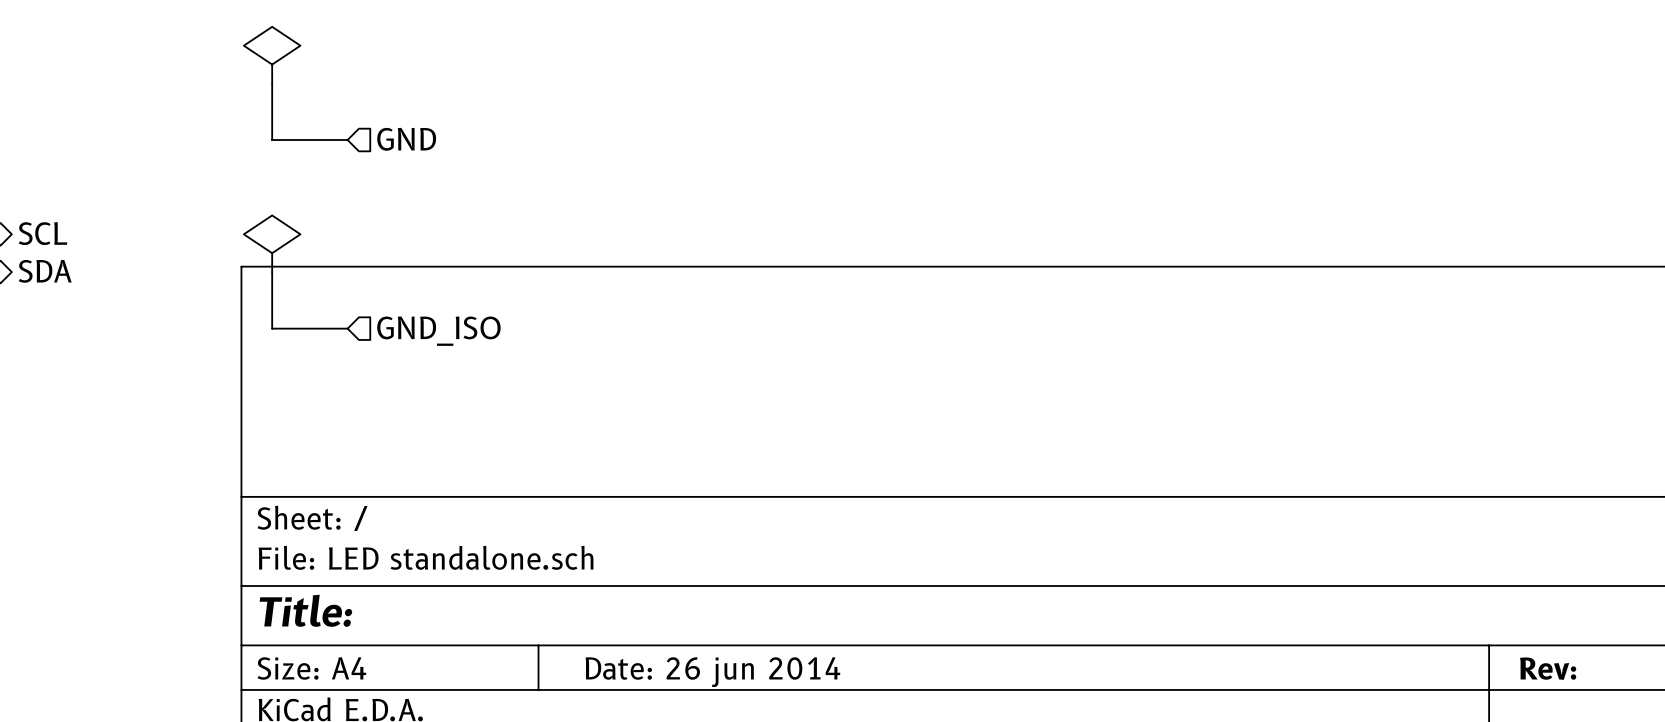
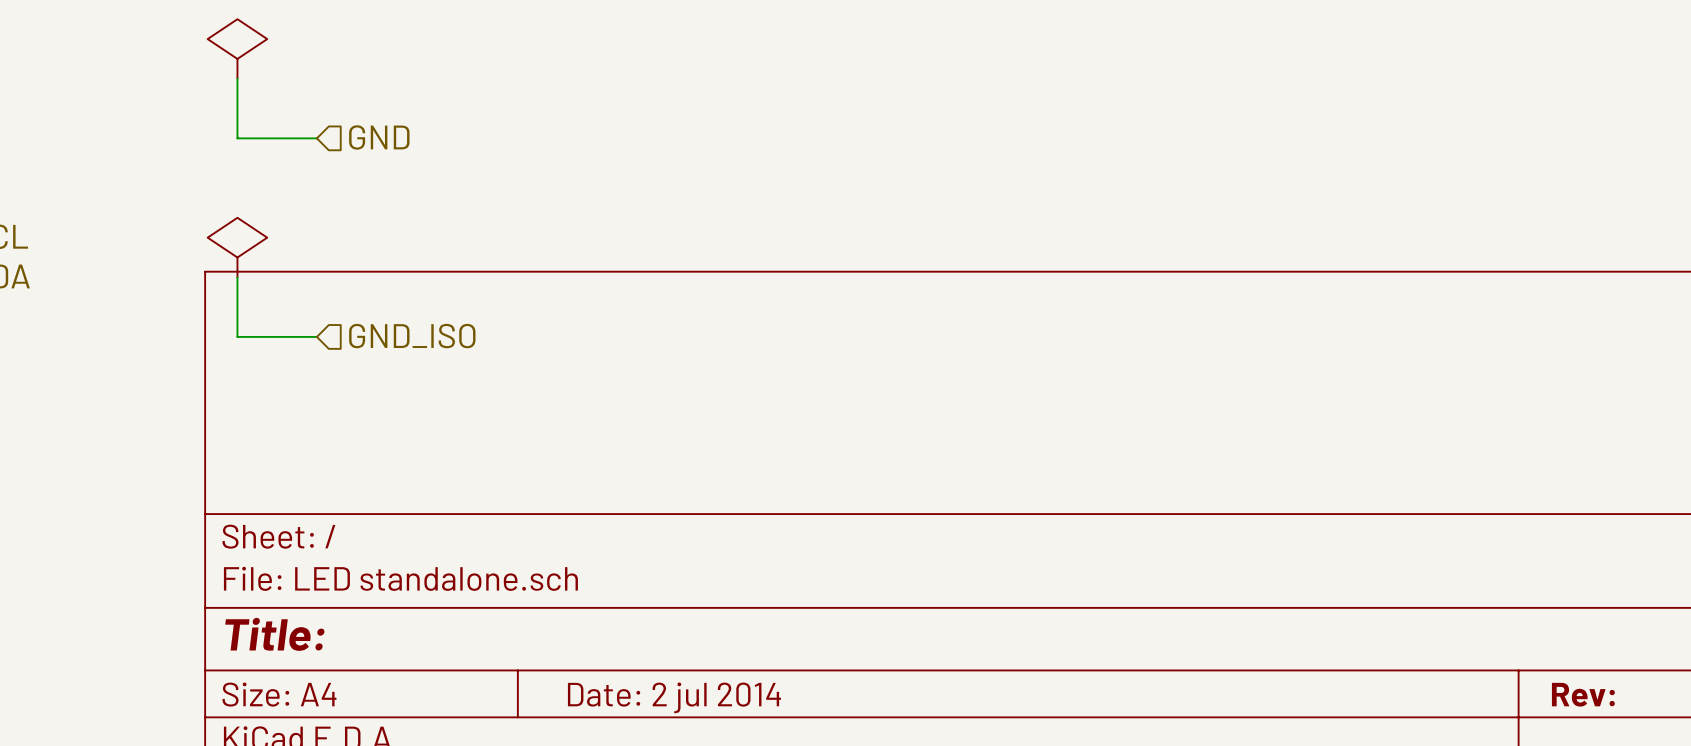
title block: Date: 26 jun 2014 (712, 672) -> Date: 2 jul 2014 (674, 697)

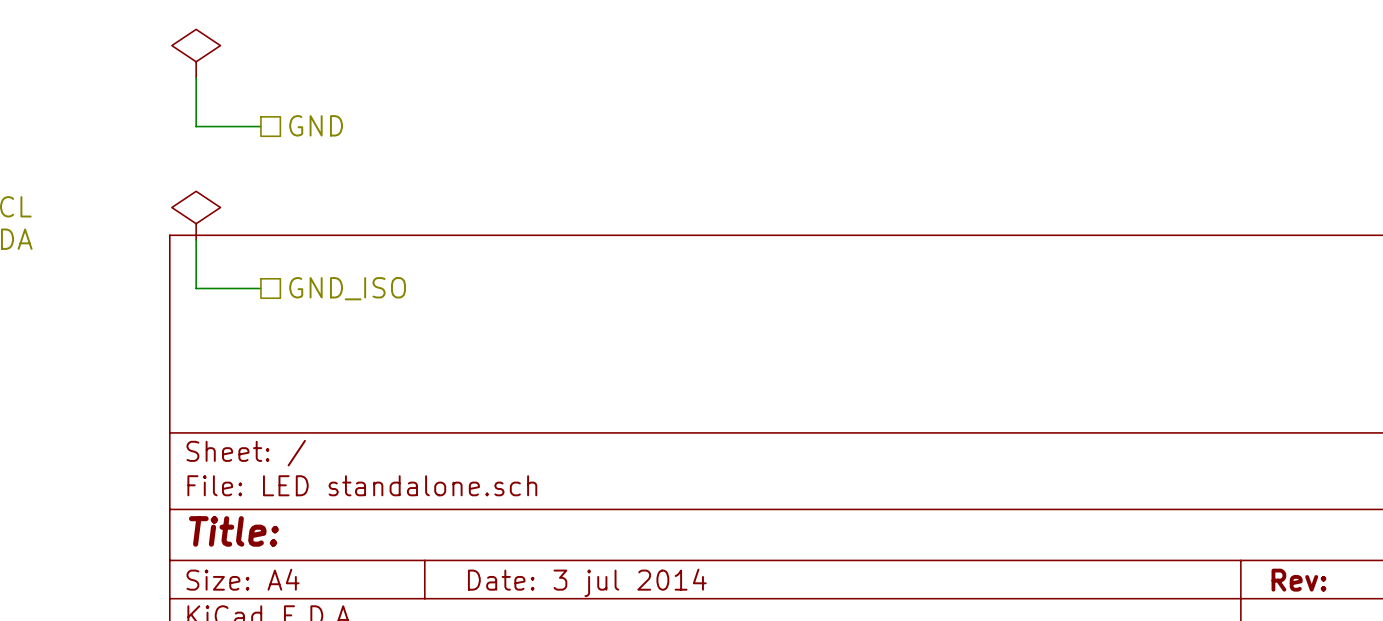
hierarchical label shape: input (379, 137) -> passive (316, 125)
hierarchical label shape: input (412, 336) -> passive (347, 288)
title block: Date: 2 jul 2014 (674, 697) -> Date: 3 jul 2014 (587, 582)

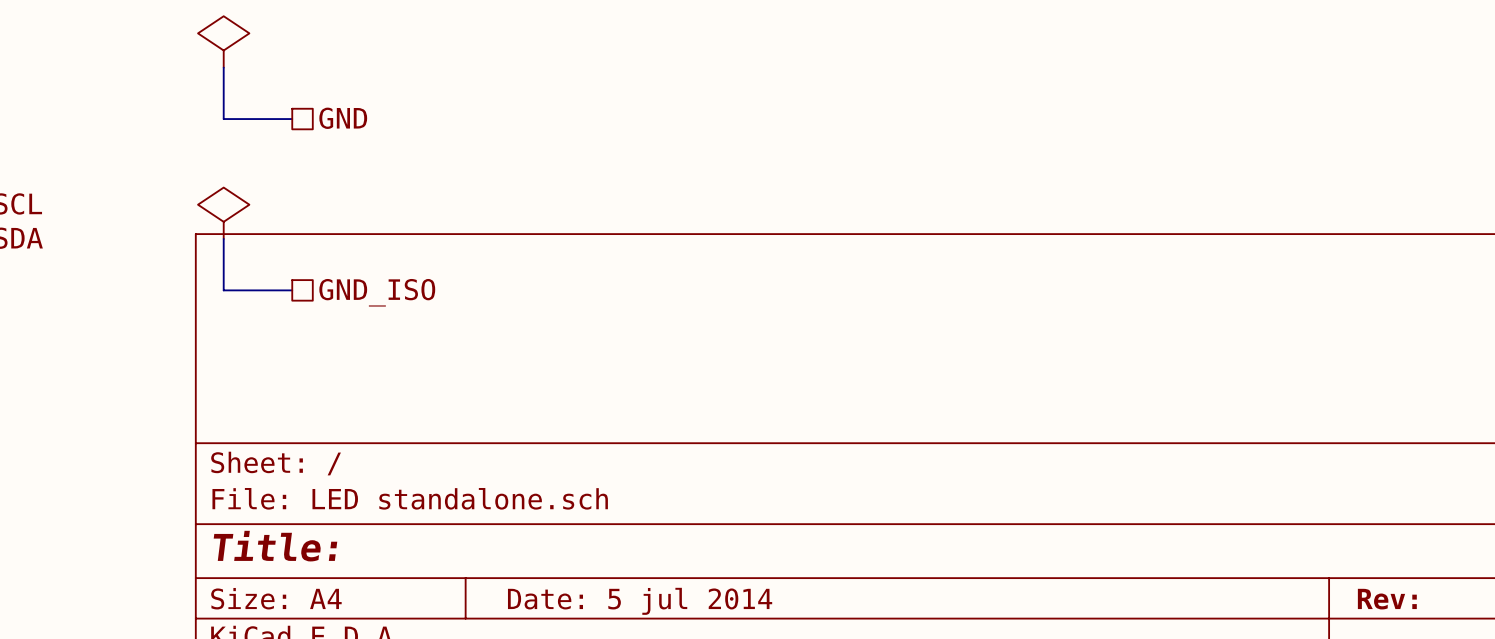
title block: Date: 3 jul 2014 (587, 582) -> Date: 5 jul 2014 (640, 601)

